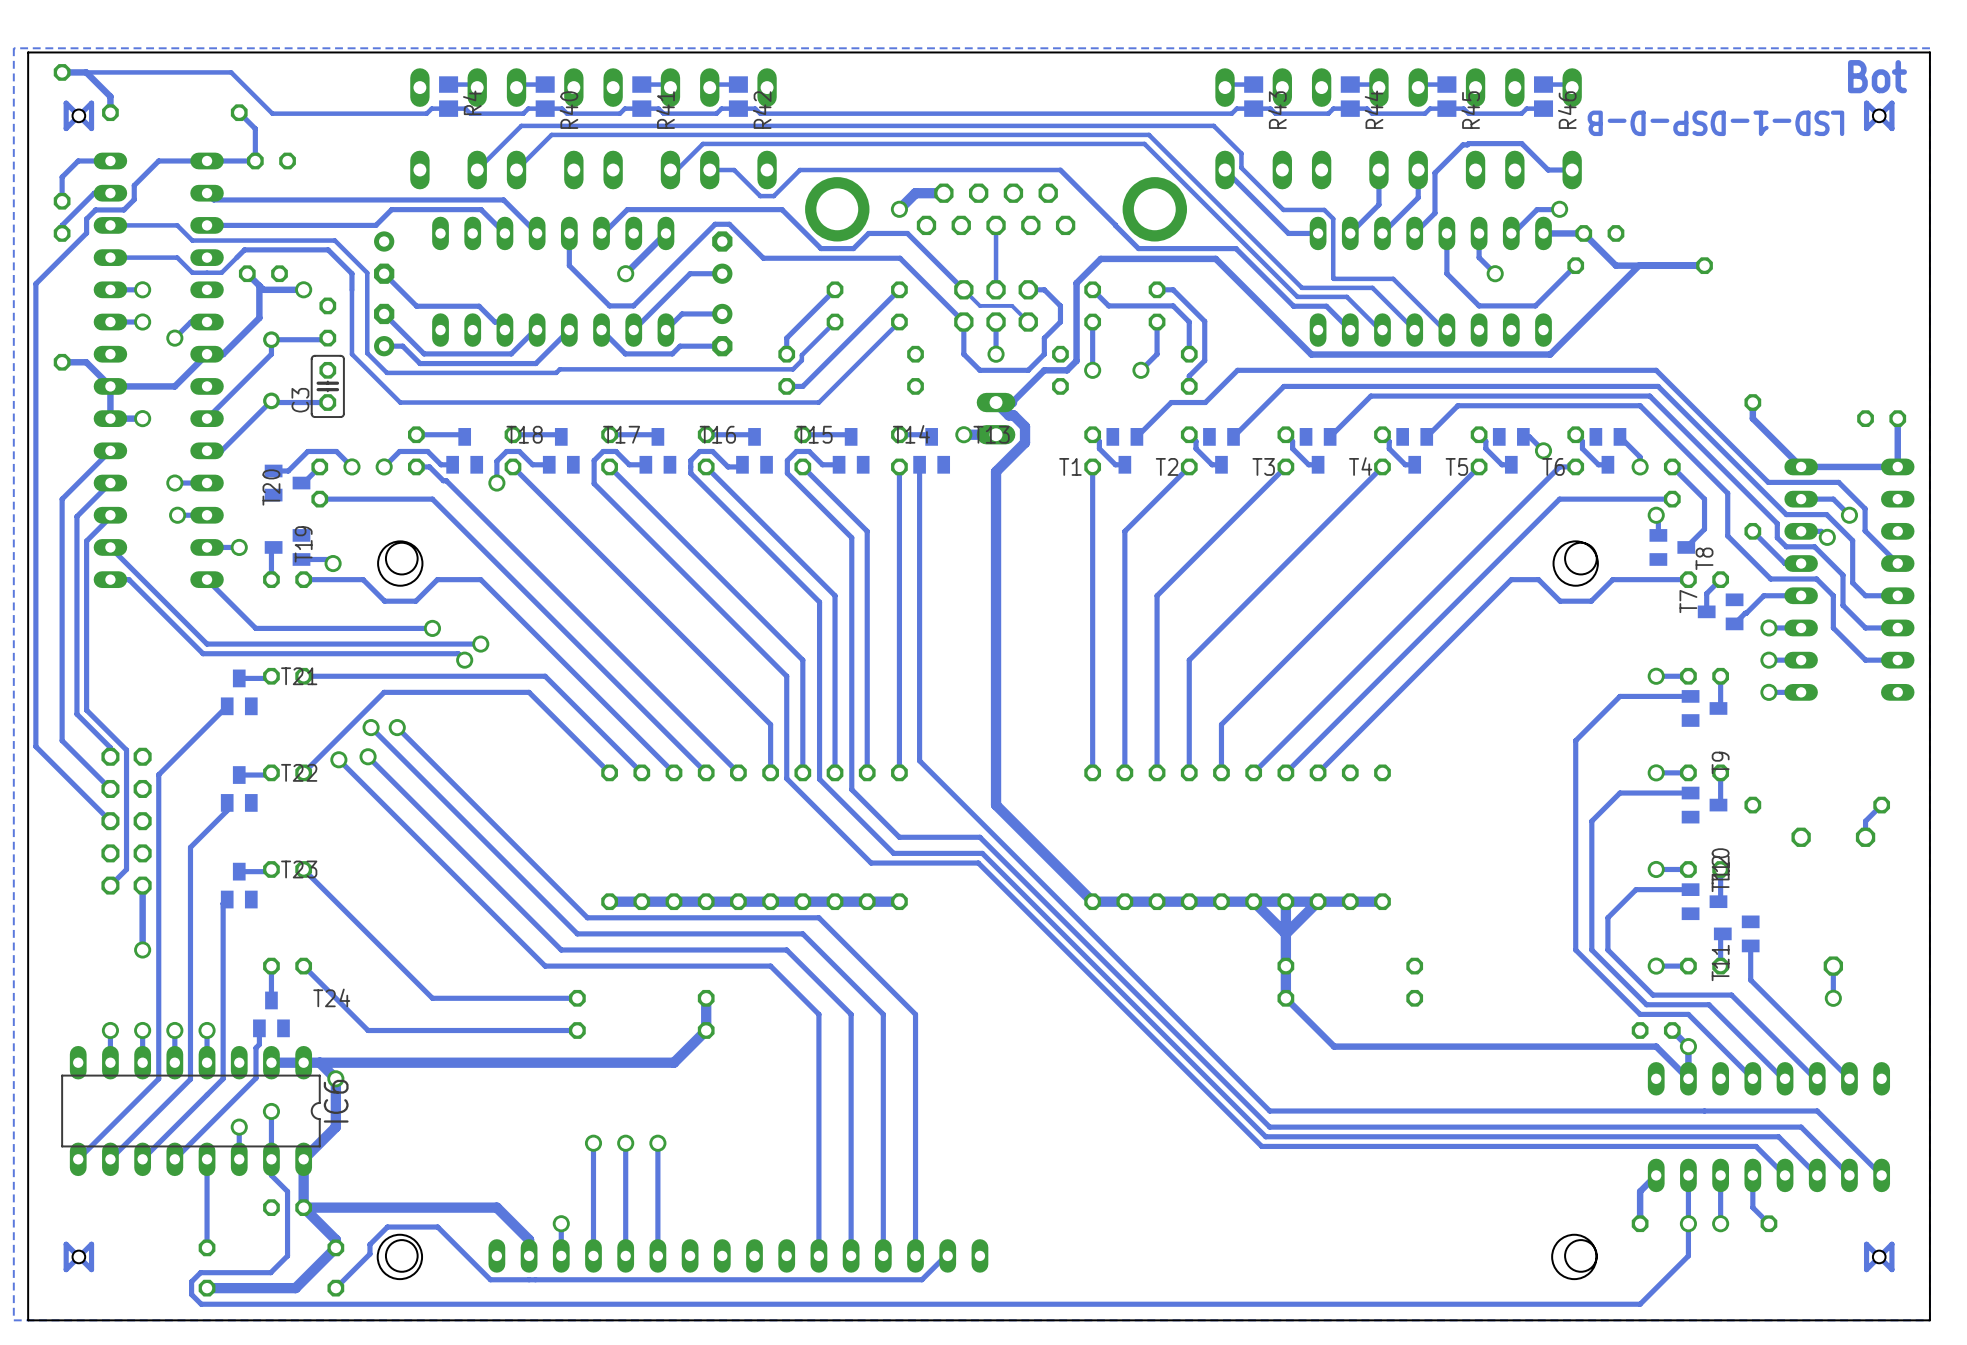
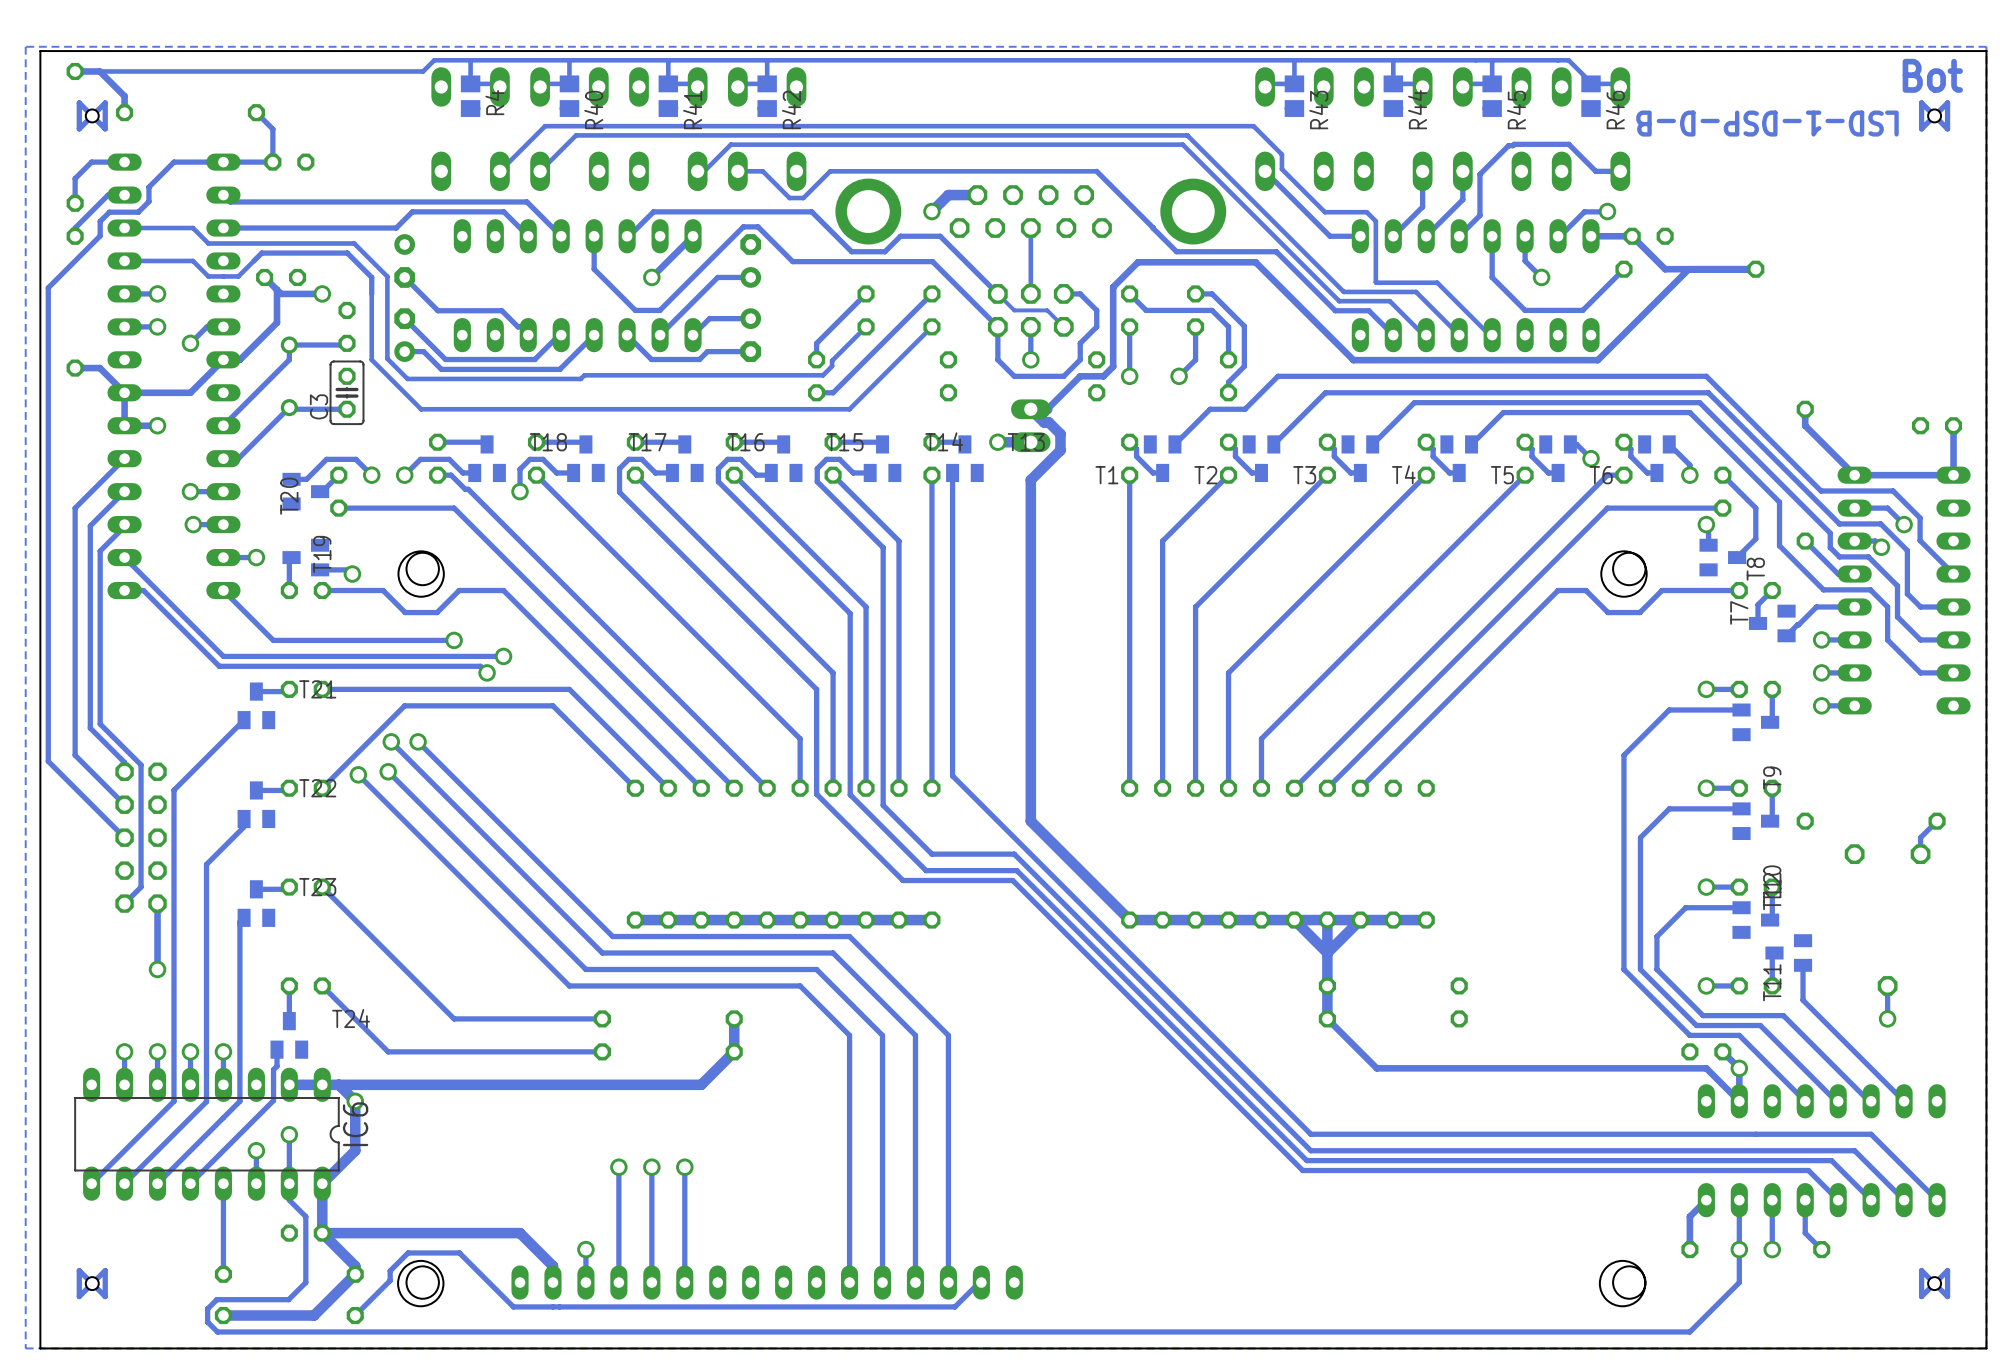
track: none -> (470, 60) (470, 83)
track: none -> (569, 60) (569, 83)
track: none -> (668, 60) (668, 83)
track: none -> (767, 60) (767, 83)
track: none -> (1294, 60) (1294, 83)
track: none -> (1393, 60) (1393, 83)
track: none -> (1492, 60) (1492, 83)
track: (231, 72) (272, 113) (426, 113) (431, 108) (448, 108) -> (248, 71) (423, 71) (434, 60) (1568, 60) (1588, 79) (1591, 79) (1591, 83)
track: (537, 108) (528, 108) (523, 113) (470, 113) (465, 108) (456, 108) -> none
track: (641, 108) (624, 108) (619, 113) (567, 113) (562, 108) (545, 108) -> none
track: (730, 108) (721, 108) (716, 113) (663, 113) (658, 108) (649, 108) -> none
track: (1246, 108) (1236, 108) (1231, 113) (760, 113) (755, 108) (738, 108) -> none
track: (1350, 108) (1333, 108) (1328, 113) (1275, 113) (1270, 108) (1253, 108) -> none
track: (1439, 108) (1430, 108) (1425, 113) (1372, 113) (1367, 108) (1357, 108) -> none
track: (1543, 108) (1526, 108) (1521, 113) (1468, 113) (1463, 108) (1446, 108) -> none

